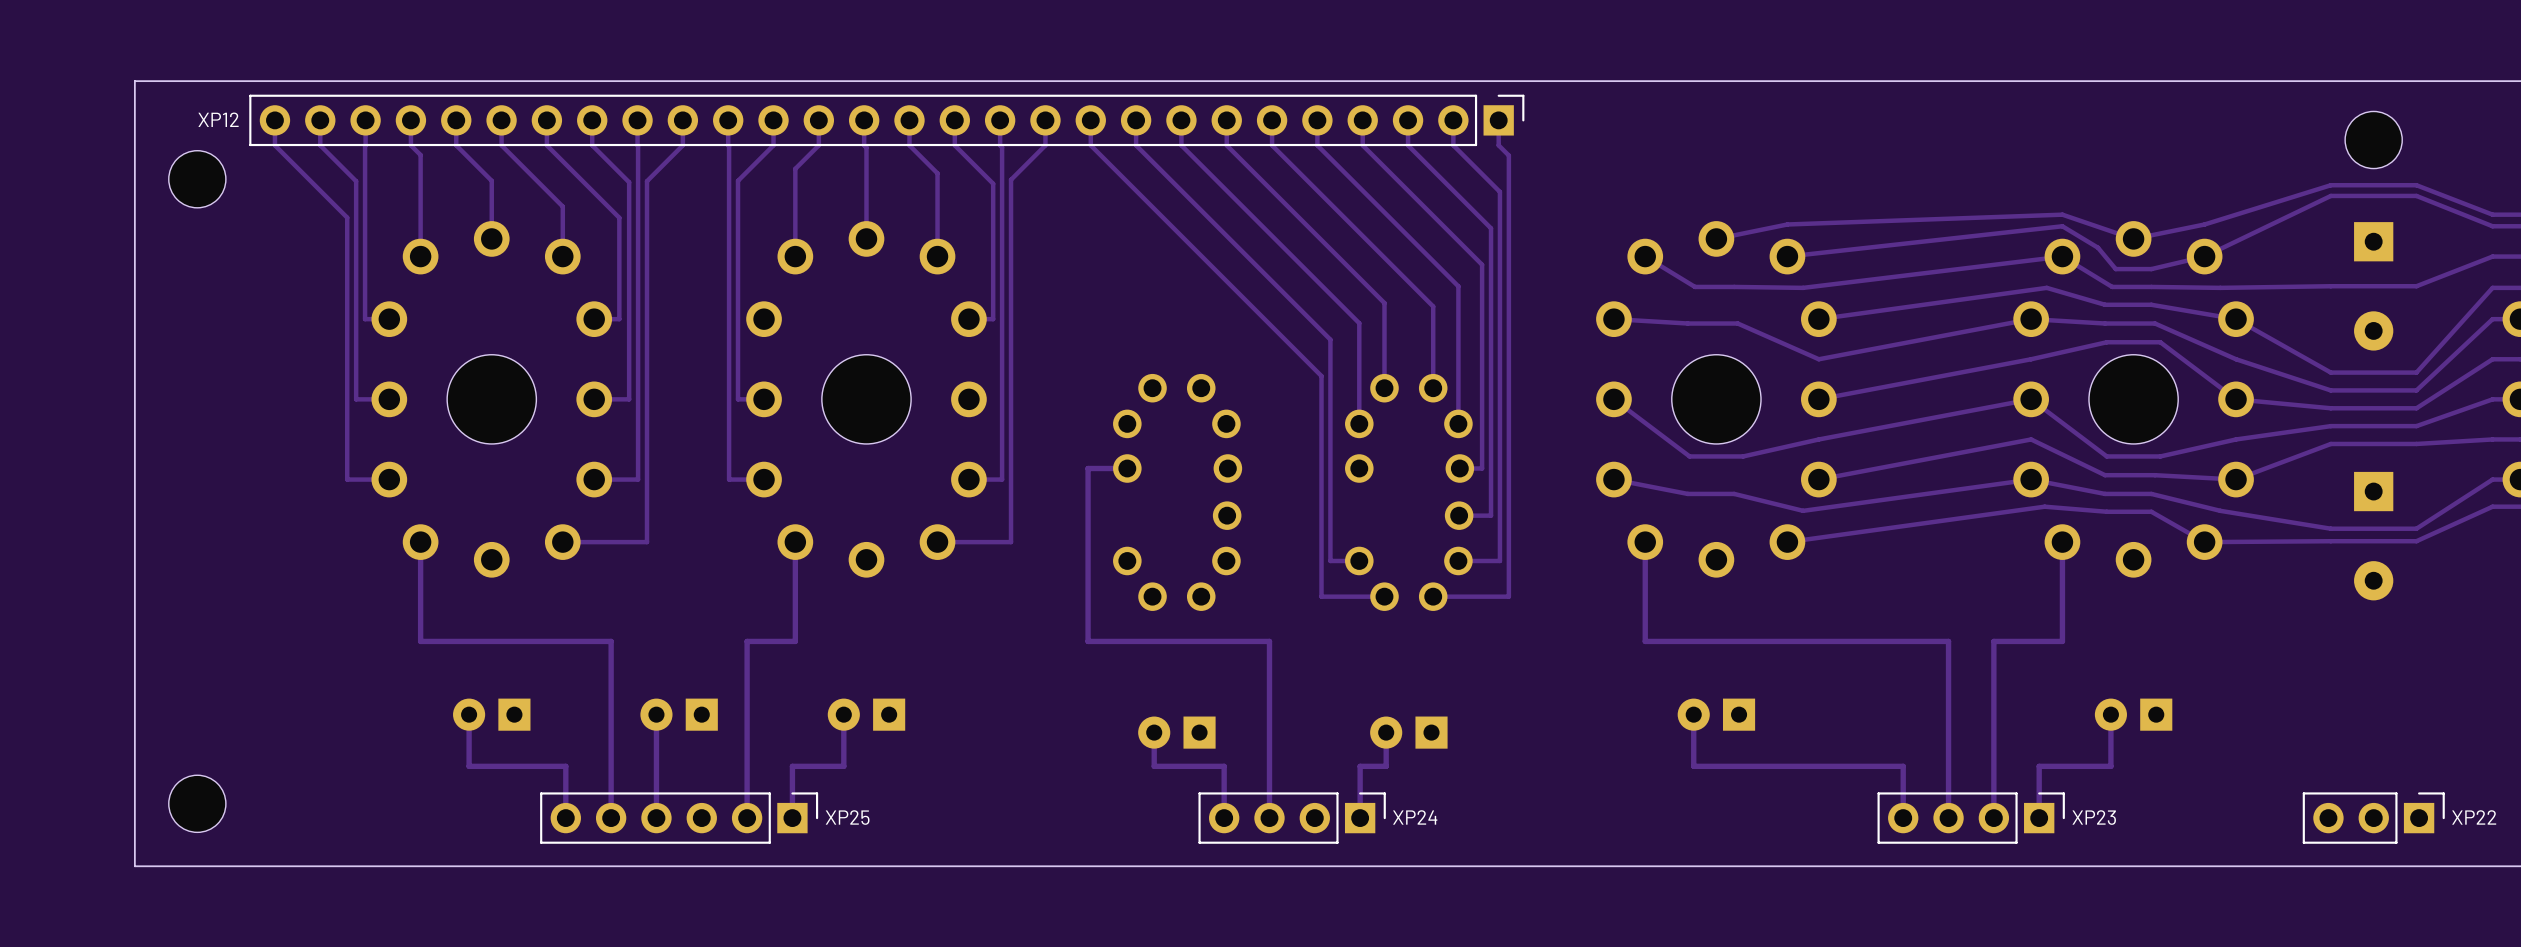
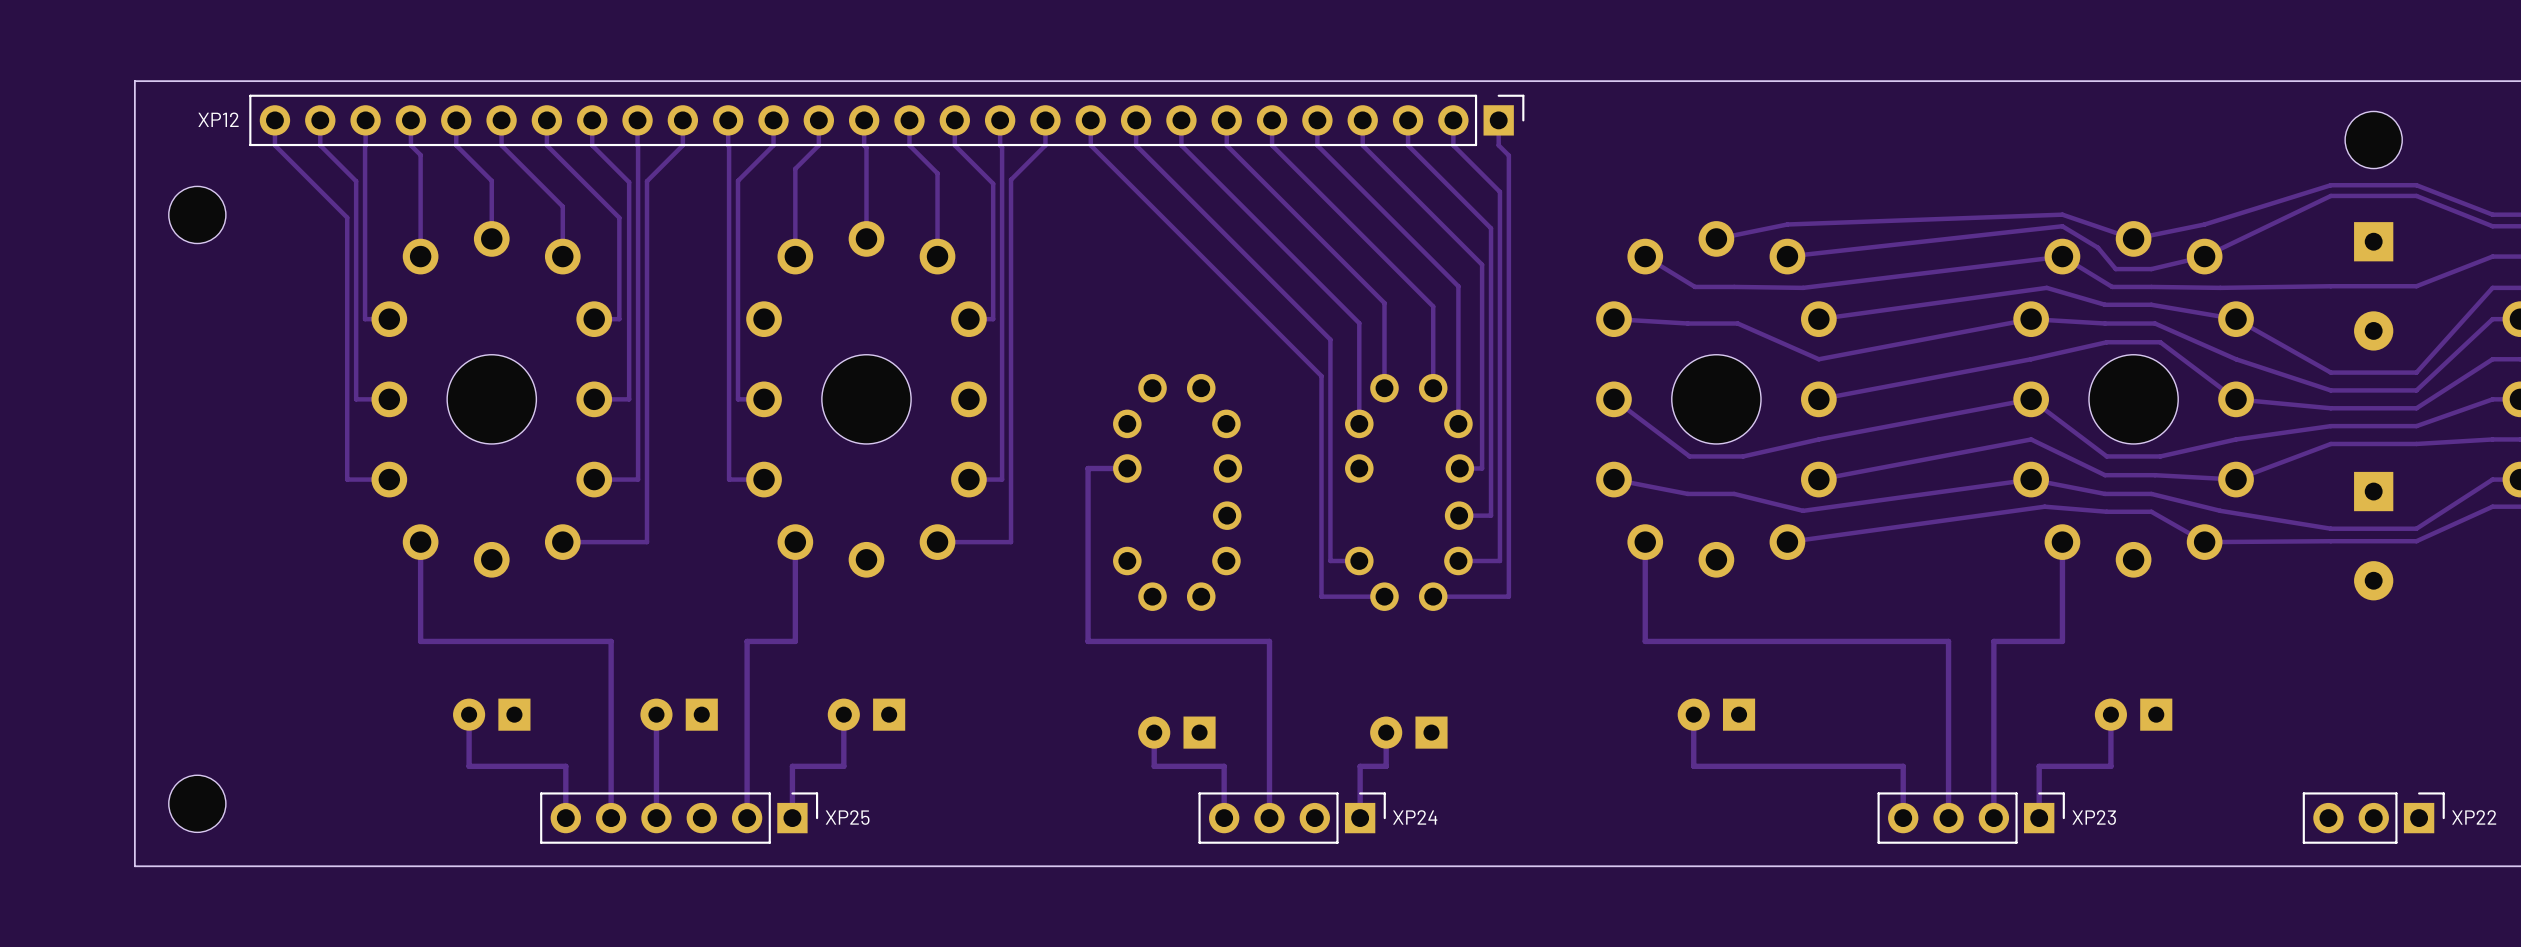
part position: (197, 179) -> (197, 214)

